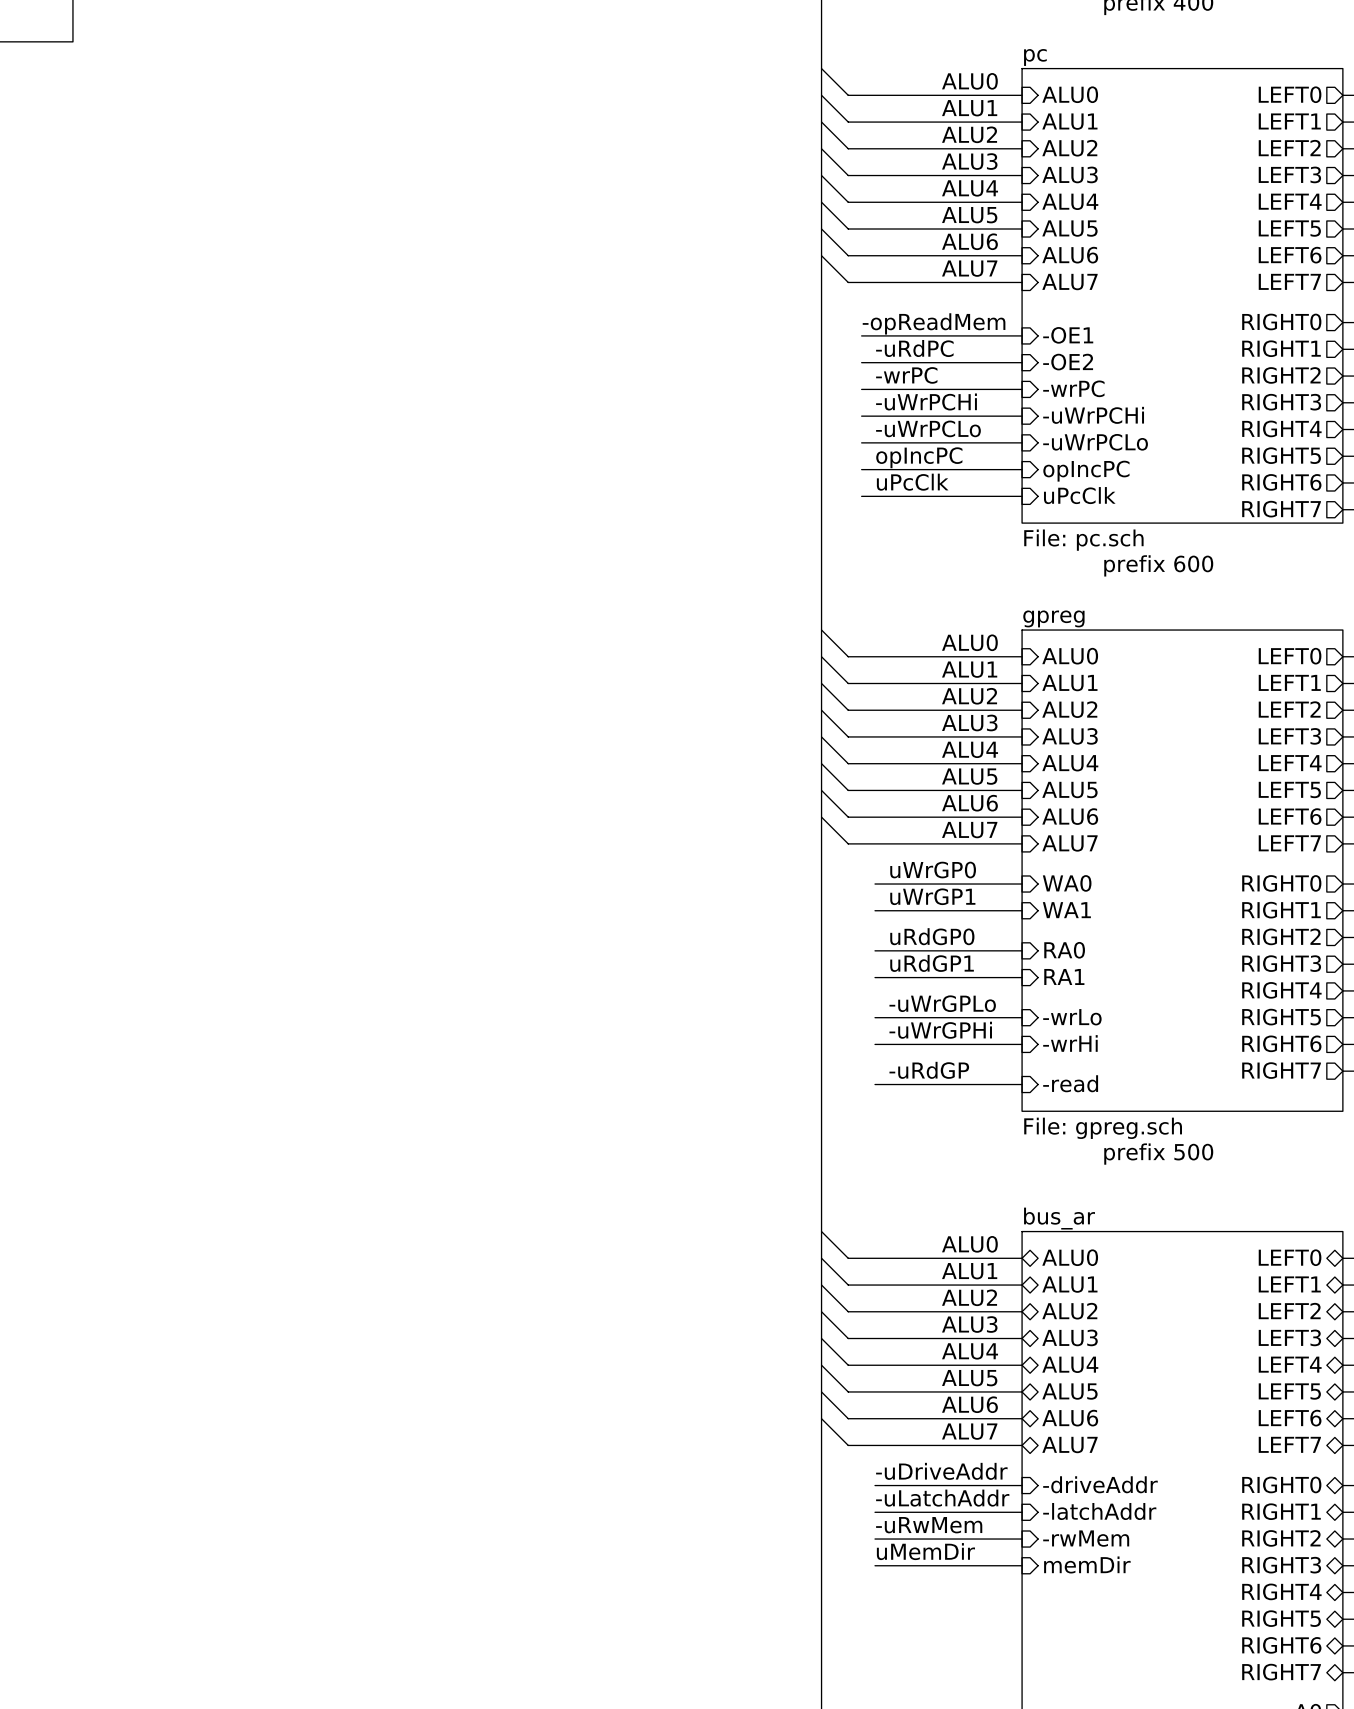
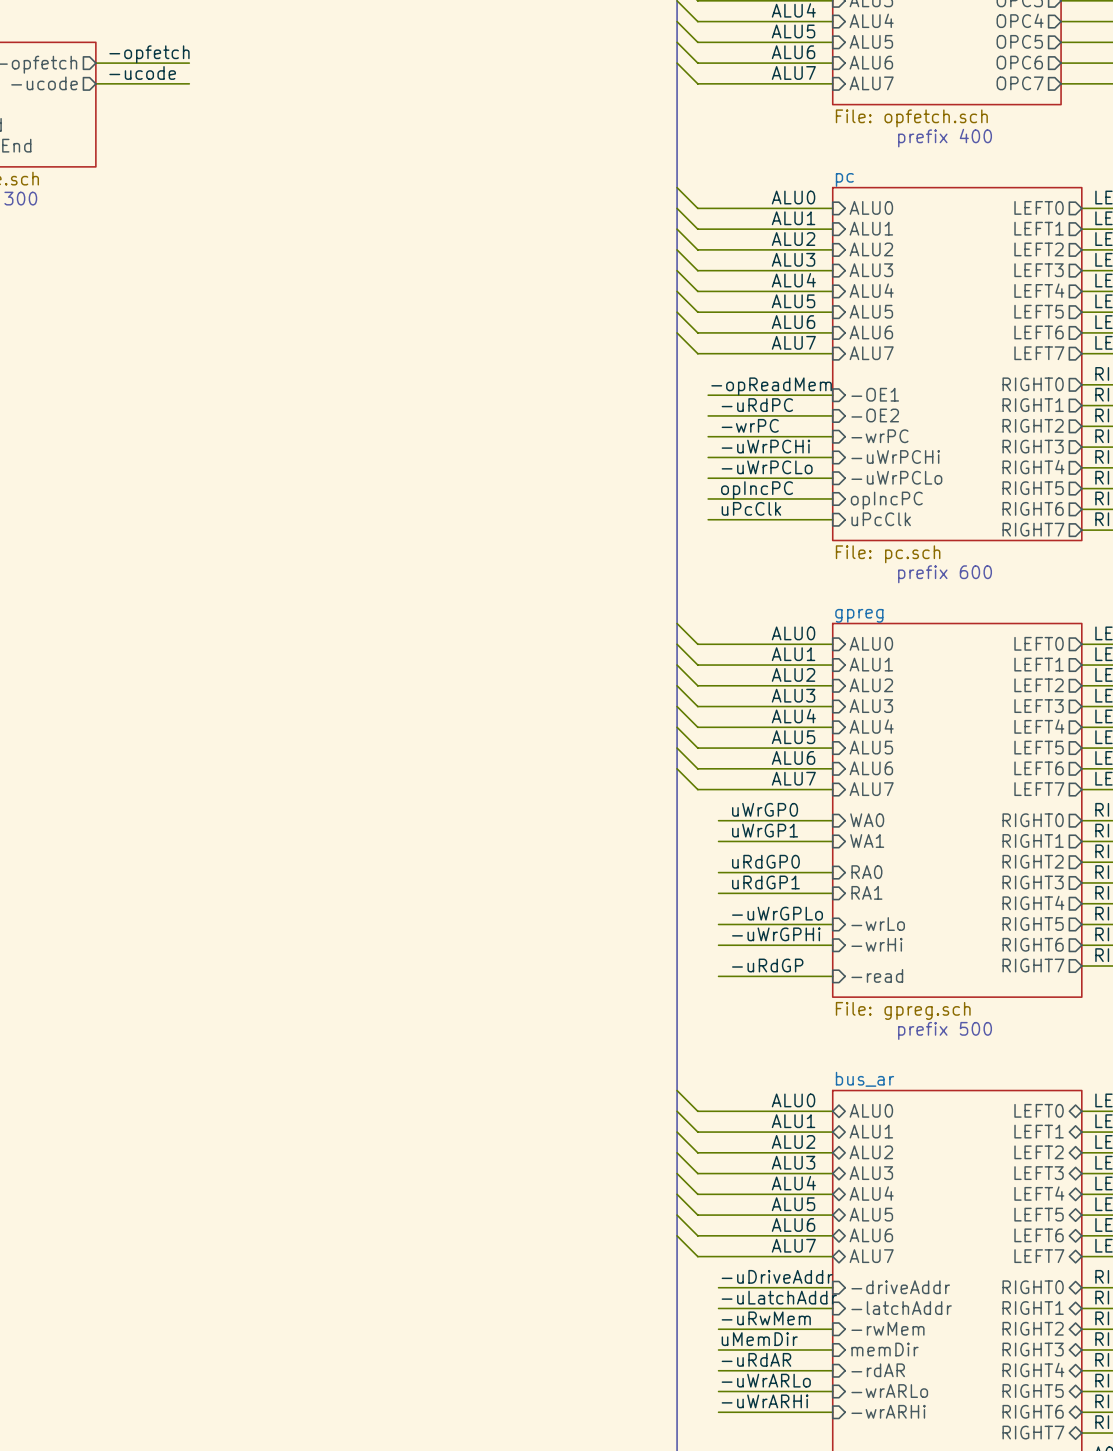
label: none -> -uRdAR (756, 1359)
sheet pin: none -> -rdAR (878, 1370)
wire: none -> (718, 1370) (832, 1370)
label: none -> -uWrARLo (766, 1380)
sheet pin: none -> -wrARLo (889, 1391)
wire: none -> (718, 1391) (832, 1391)
label: none -> -uWrARHi (765, 1401)
wire: none -> (718, 1412) (832, 1412)
sheet pin: none -> -wrARHi (888, 1411)

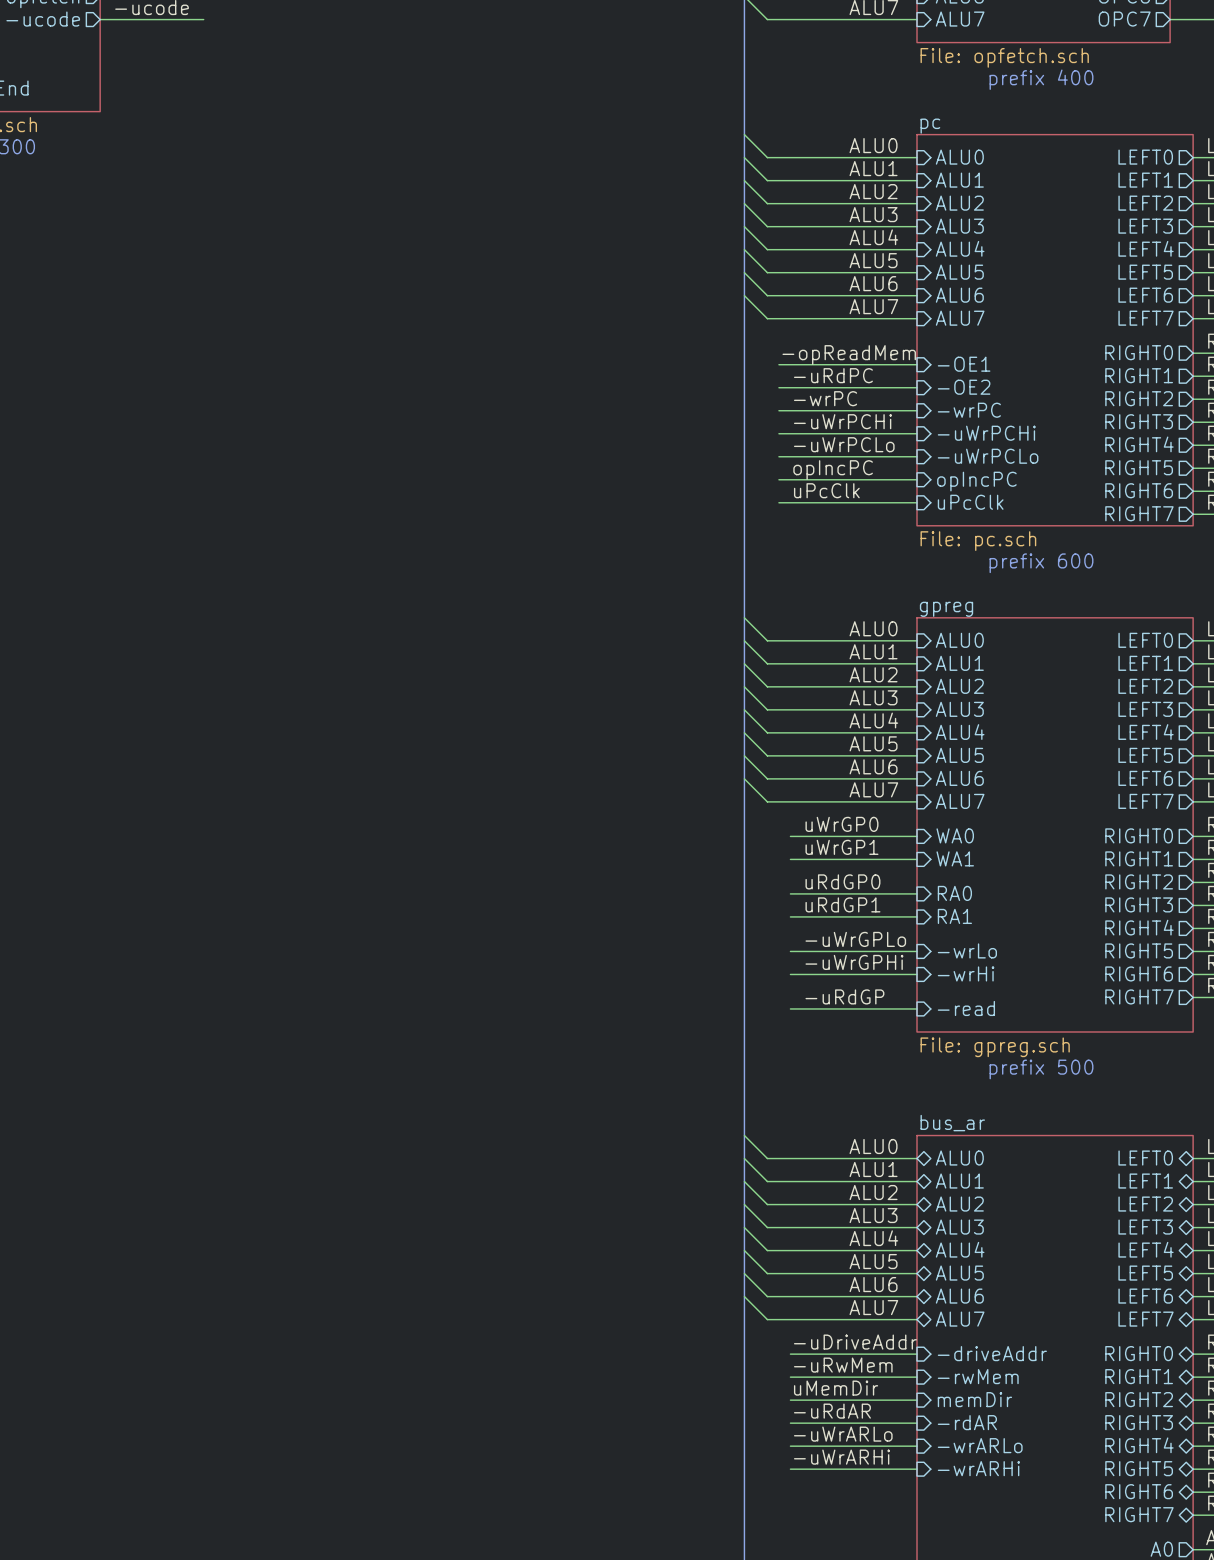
label: -uLatchAddr (779, 1297) -> -uRwMem (843, 1365)
sheet pin: -latchAddr (901, 1308) -> -rwMem (978, 1376)
label: -uRwMem (766, 1318) -> uMemDir (836, 1388)
sheet pin: -rwMem (887, 1328) -> memDir (974, 1399)
label: uMemDir (759, 1339) -> -uRdAR (832, 1411)
sheet pin: memDir (885, 1349) -> -rdAR (967, 1422)
label: -uRdAR (756, 1359) -> -uWrARLo (843, 1434)
sheet pin: -rdAR (878, 1370) -> -wrARLo (980, 1445)
label: -uWrARLo (766, 1380) -> -uWrARHi (841, 1457)
sheet pin: -wrARLo (889, 1391) -> -wrARHi (978, 1468)
label: -uWrARHi (765, 1401) -> none
sheet pin: -wrARHi (888, 1411) -> none
wire: (718, 1412) (832, 1412) -> none

